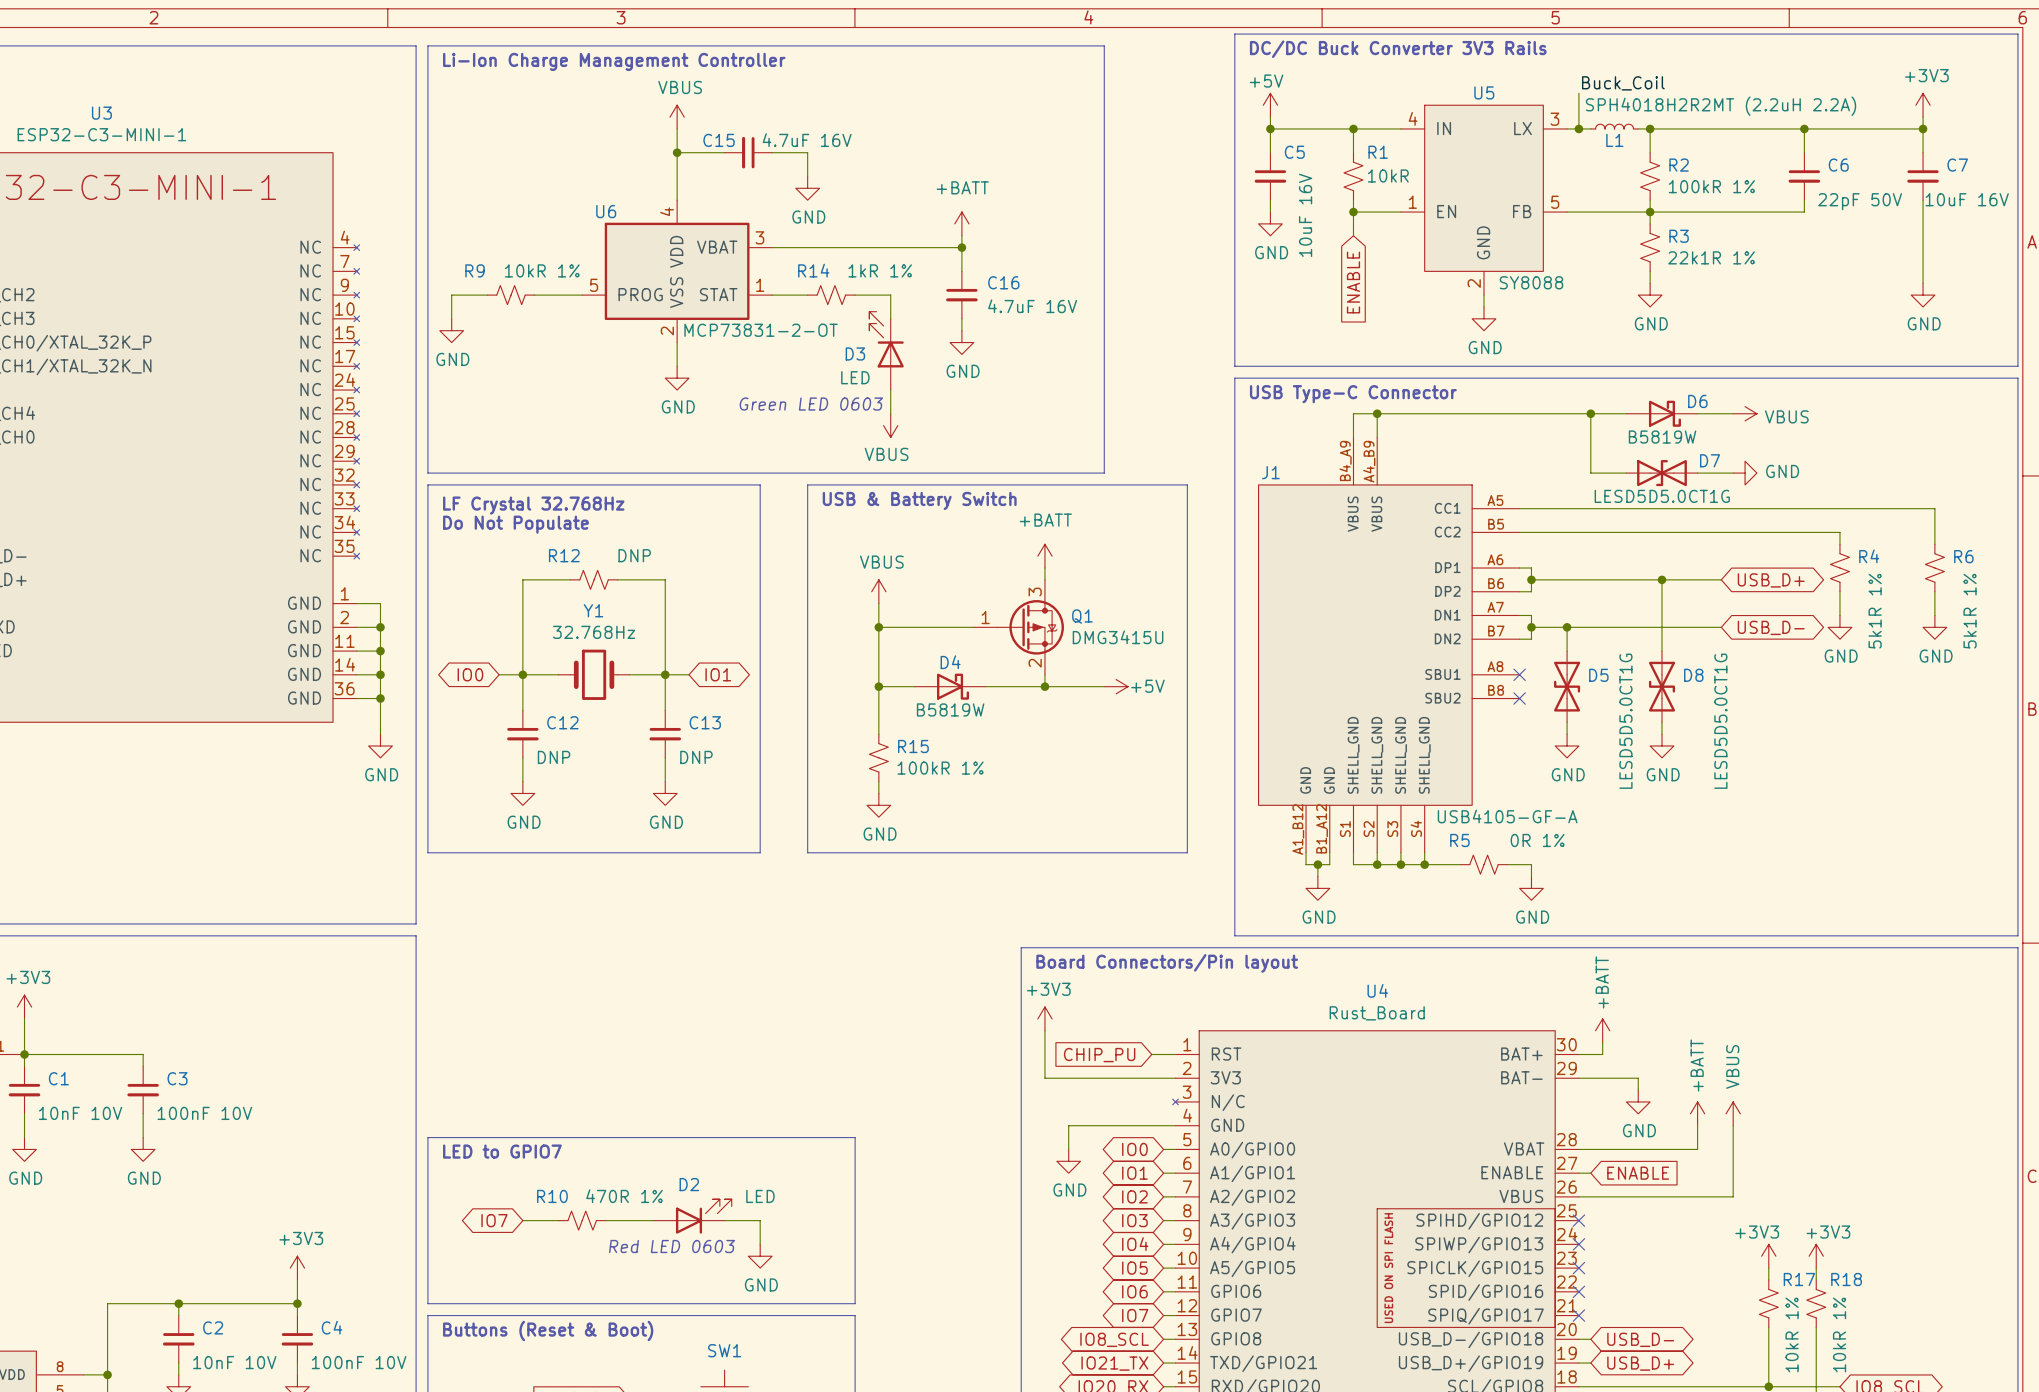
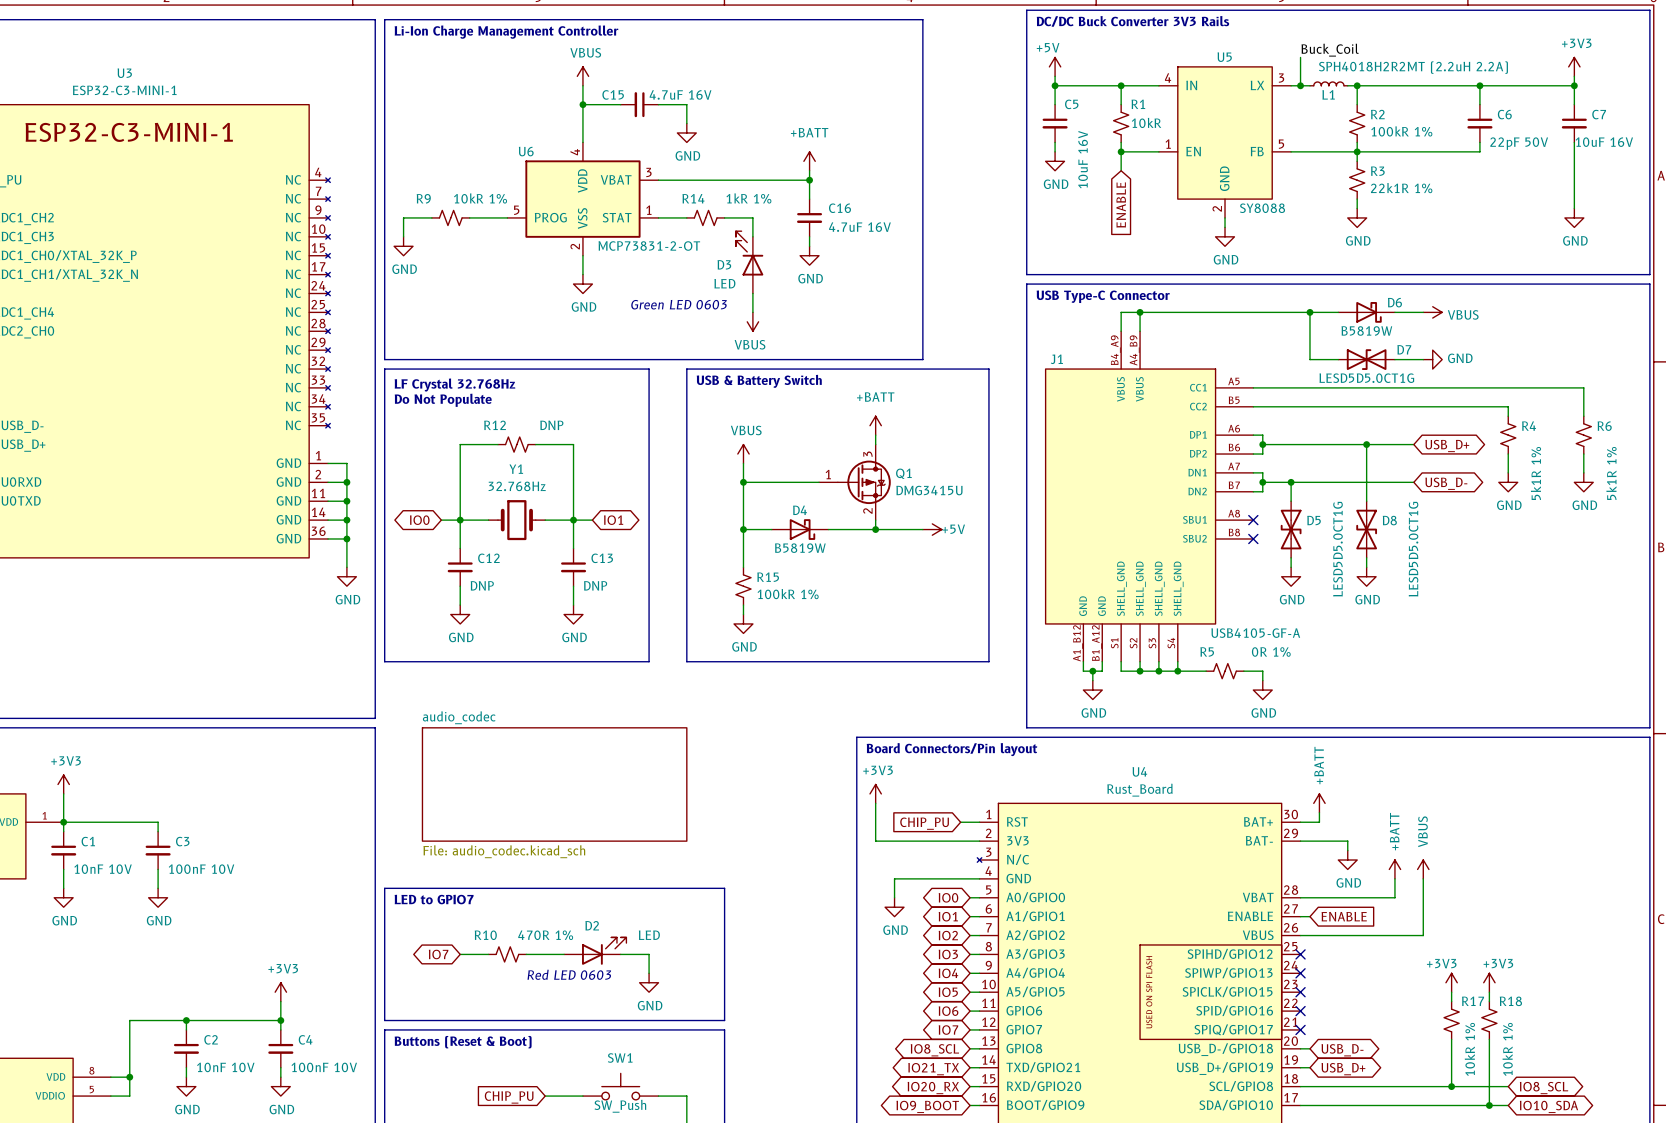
sheet audio_codec: none -> File: audio_codec.kicad_sch (554, 784)

